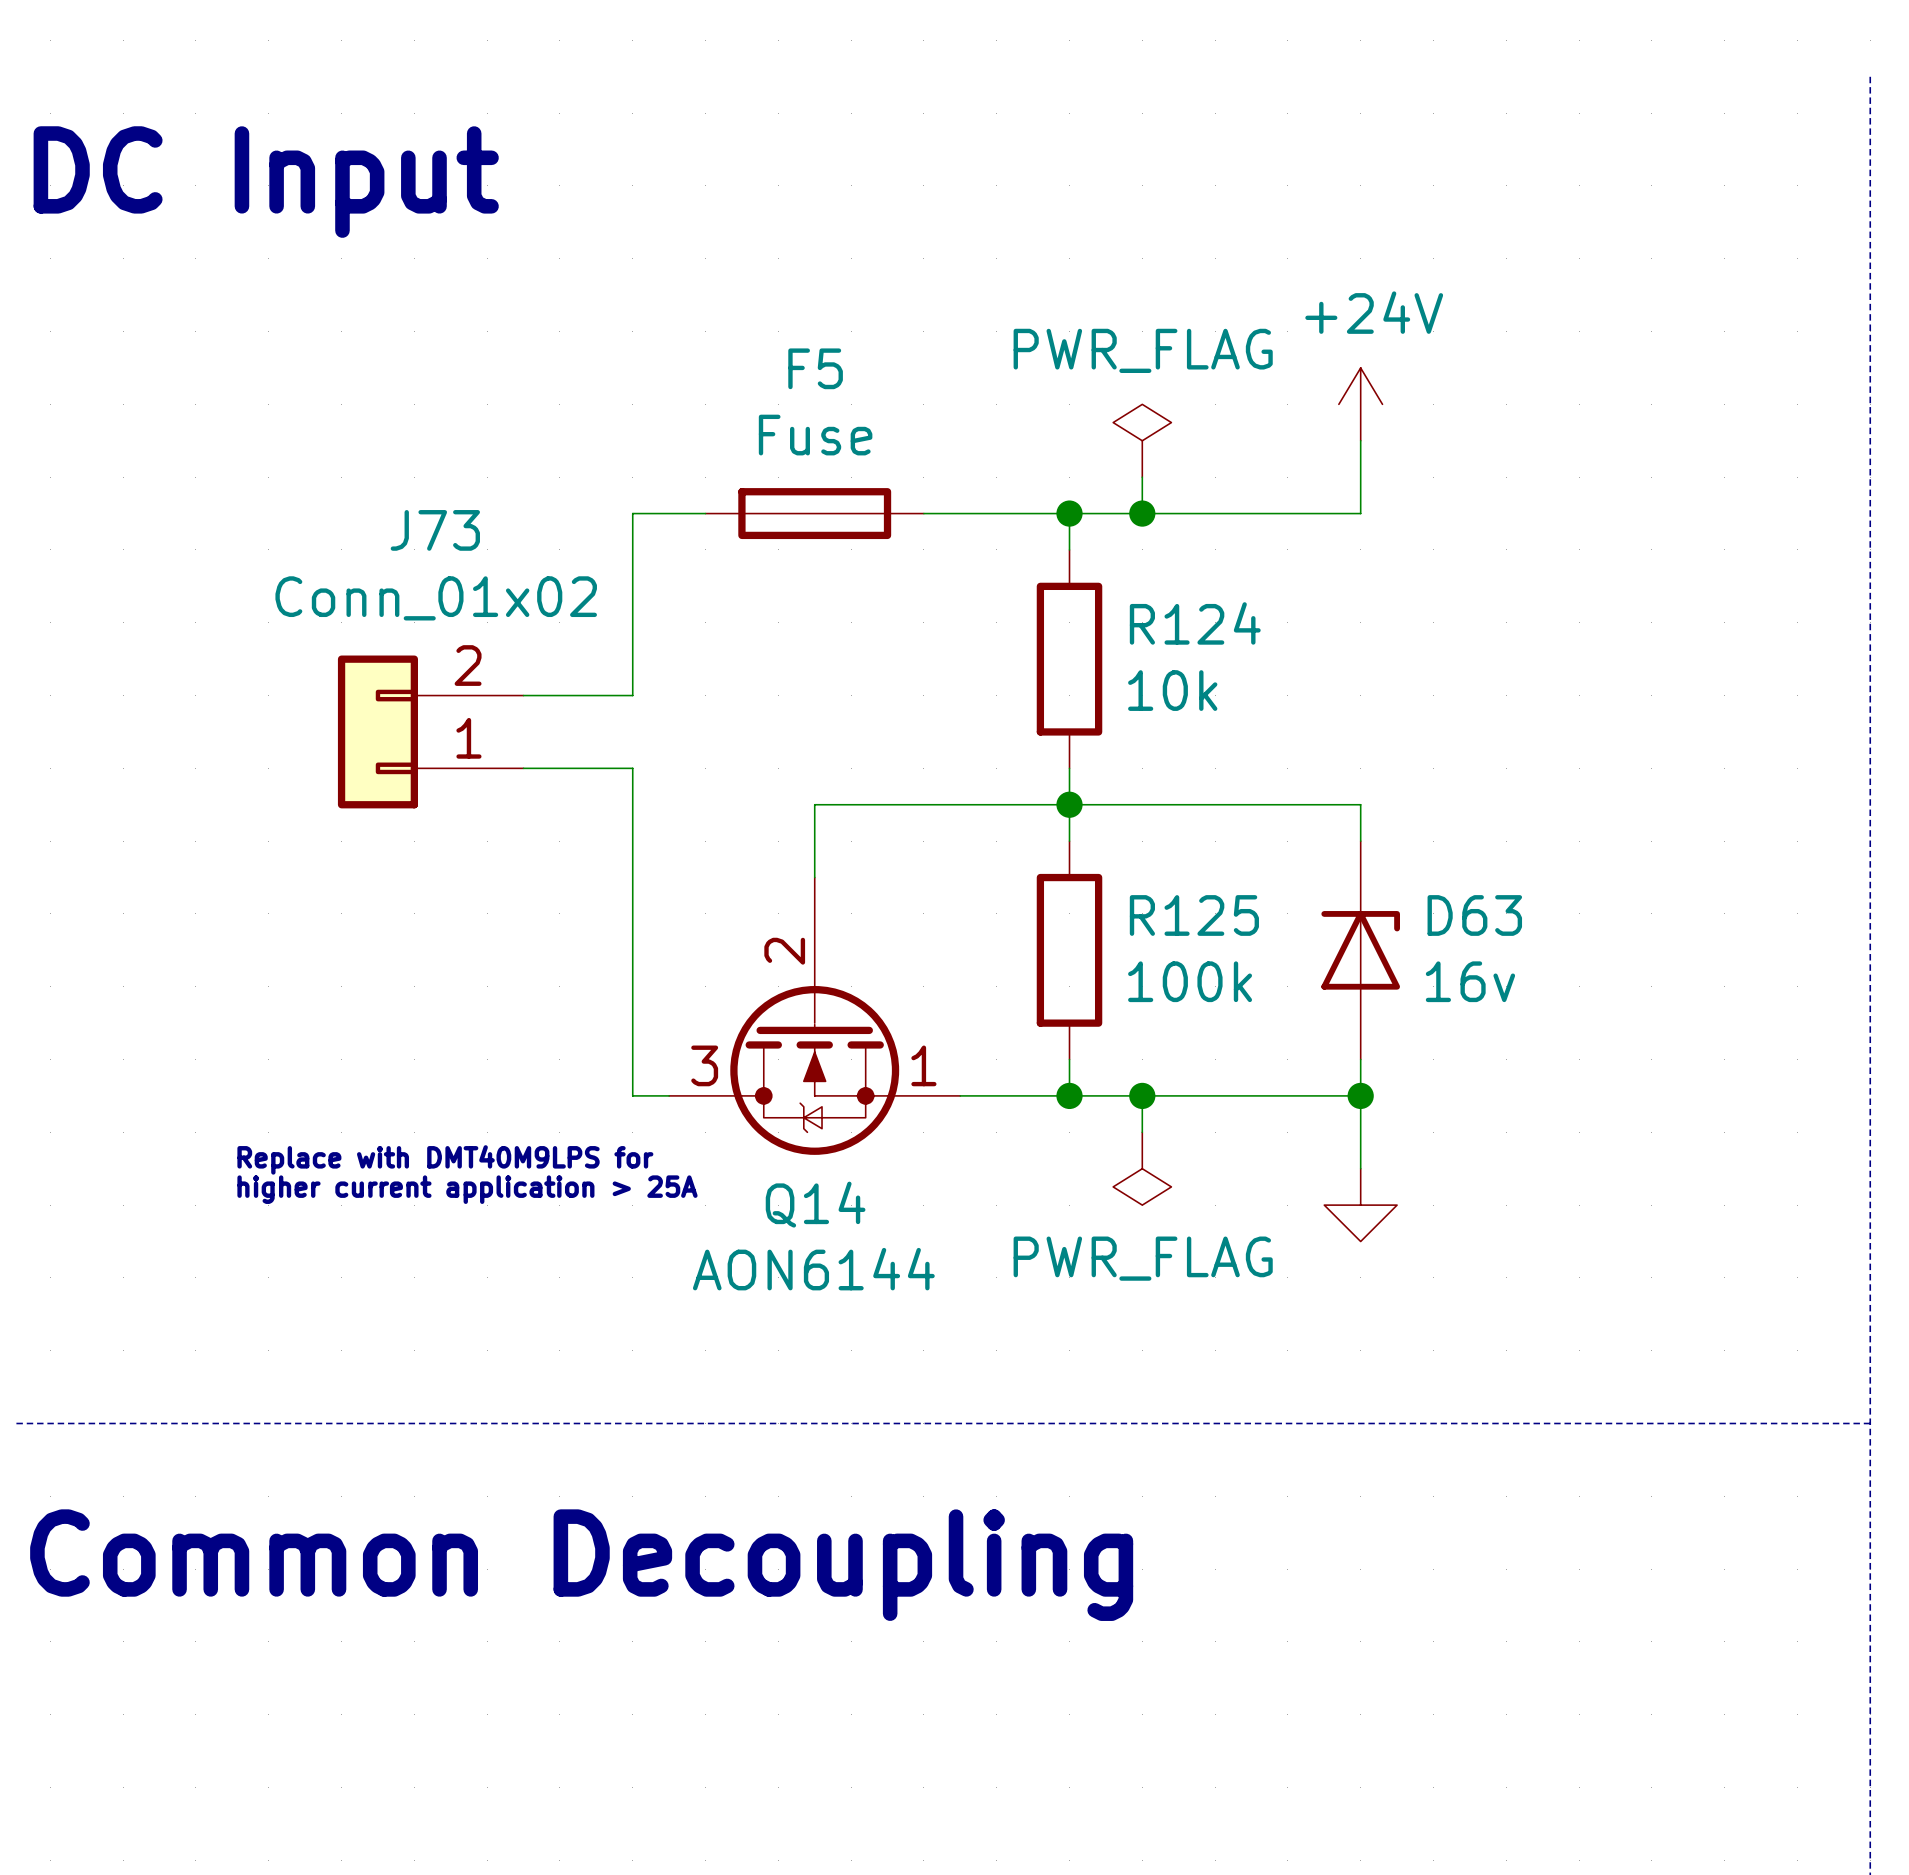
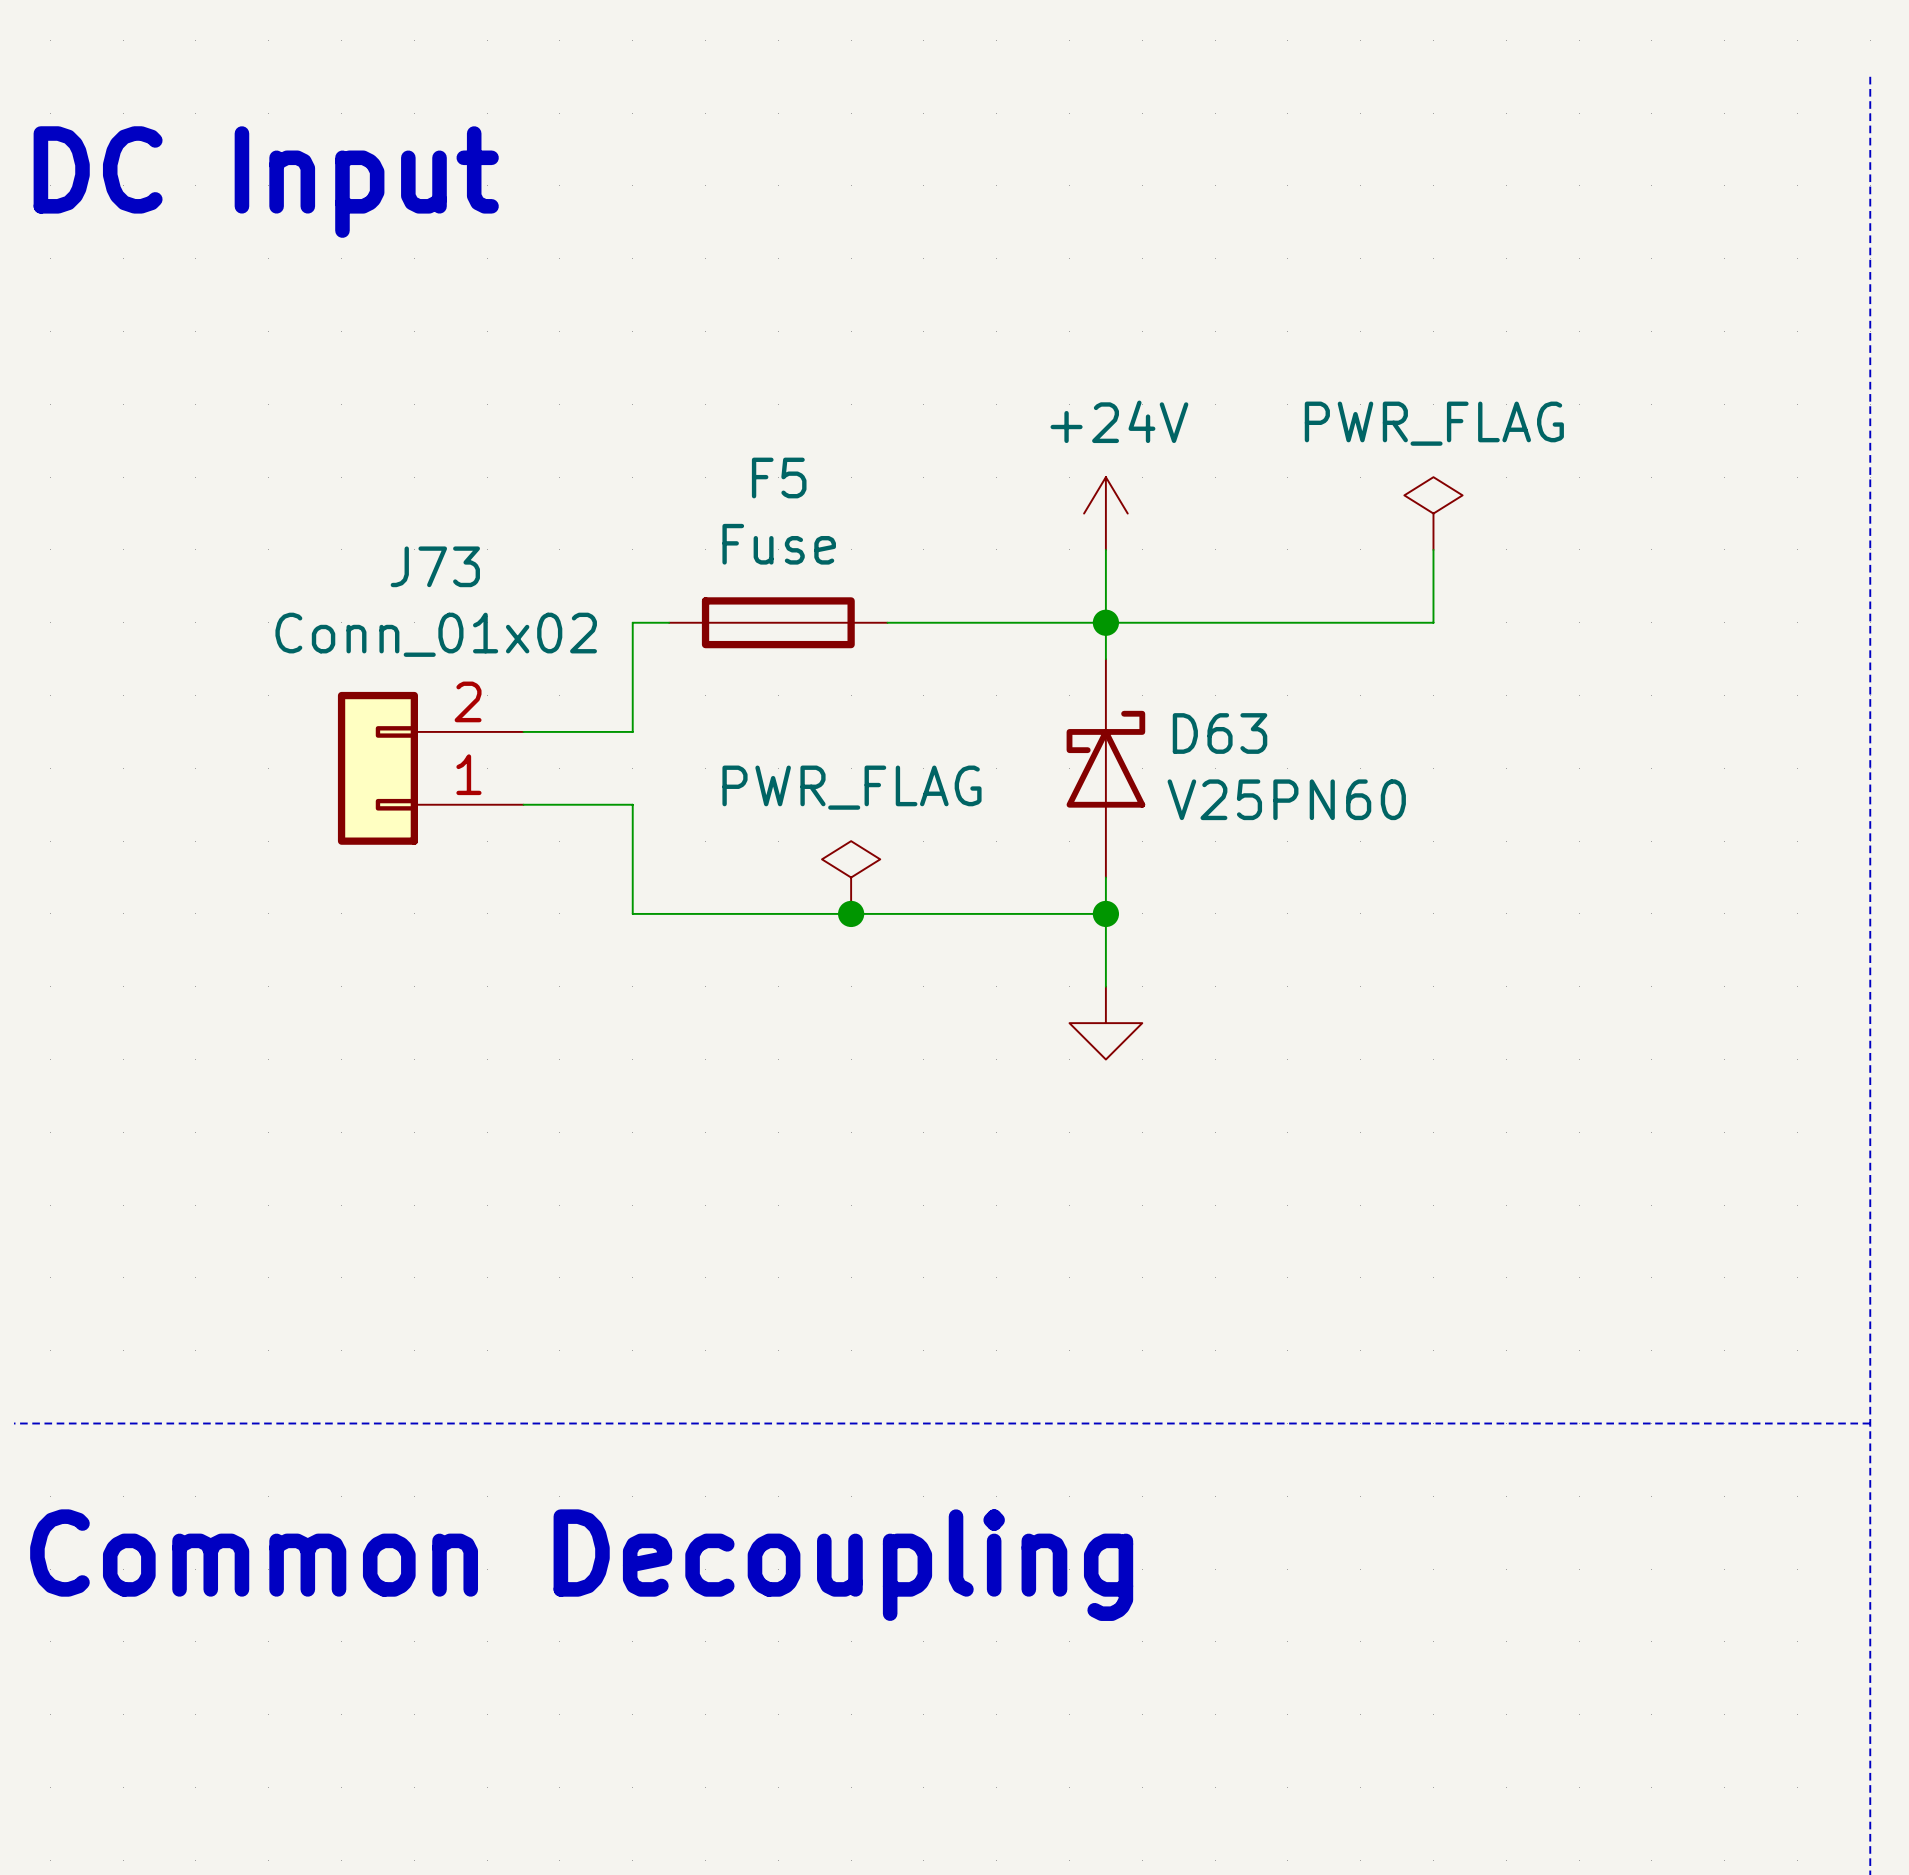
power symbol position: +24V (1360, 404) -> +24V (1105, 513)
power symbol: PWR_FLAG (1142, 440) -> none
wire: (1360, 440) (1360, 513) (923, 513) -> none
wire: (1142, 477) (1142, 513) -> none
wire: (705, 513) (632, 513) (632, 622) -> (669, 622) (632, 622)
F5 position: (814, 513) -> (778, 622)
wire: (1069, 513) (1069, 549) -> none
junction: (1069, 513) -> none
junction: (1142, 513) -> none
power symbol: none -> PWR_FLAG (1433, 513)
wire: none -> (1105, 549) (1105, 659)
wire: none -> (1433, 549) (1433, 622) (887, 622)
junction: none -> (1105, 622)
R124: 10k (1069, 659) -> none
wire: (523, 695) (632, 695) -> (523, 731) (632, 731) (632, 695)
J73 position: (430, 731) -> (430, 768)
wire: (523, 768) (632, 768) (632, 804) -> (523, 804) (632, 804)
wire: (1069, 768) (1069, 841) -> none
junction: (1069, 804) -> none
D63 symbol: [1321, 841, 1400, 1060] -> [1066, 659, 1146, 878]
wire: (1360, 841) (1360, 804) (814, 804) (814, 877) -> none
power symbol: none -> PWR_FLAG (851, 877)
wire: (632, 913) (632, 1095) (669, 1095) -> (632, 913) (1105, 913)
junction: none -> (851, 913)
junction: none -> (1105, 913)
R125: 100k (1069, 950) -> none
D63 value: 16v (1470, 981) -> V25PN60 (1286, 799)
Q14: AON6144 (814, 1016) -> none
wire: (1069, 1059) (1069, 1095) -> none
wire: (1360, 1059) (1360, 1168) -> (1105, 877) (1105, 986)
wire: (960, 1095) (1360, 1095) -> none
junction: (1069, 1095) -> none
wire: (1142, 1095) (1142, 1132) -> none
junction: (1142, 1095) -> none
junction: (1360, 1095) -> none
text: Replace with DMT40M9LPS for (445, 1159) -> none
power symbol: PWR_FLAG (1142, 1168) -> none
text: higher current application > 25A (467, 1189) -> none
power symbol position: (1360, 1205) -> (1105, 1023)

